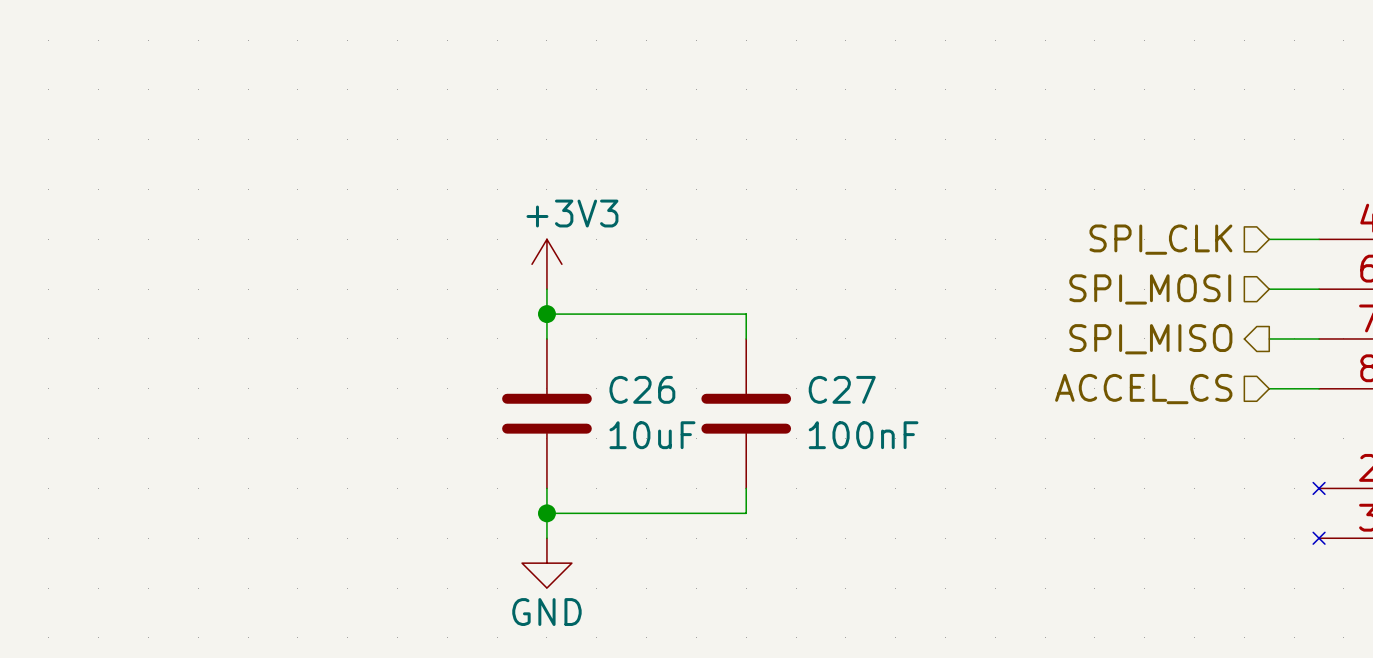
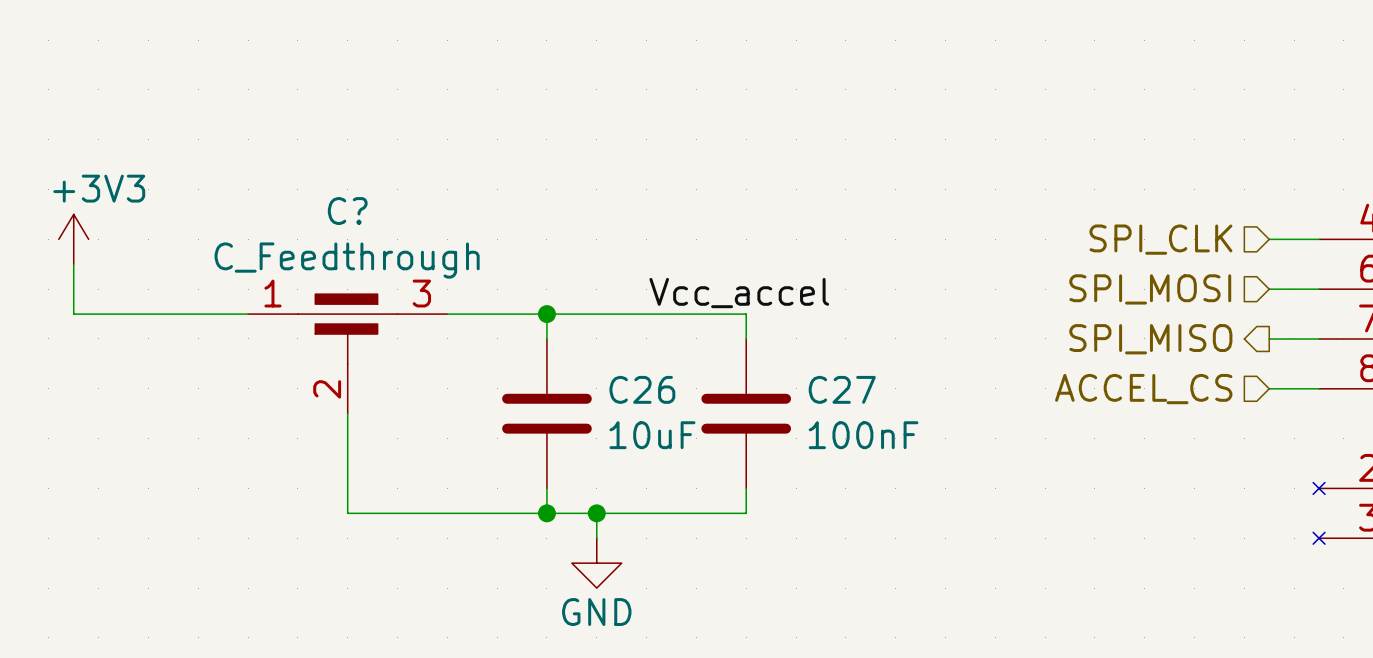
wire: none -> (73, 264) (73, 314) (248, 314)
power symbol position: +3V3 (546, 264) -> +3V3 (73, 239)
wire: (546, 289) (546, 314) -> (447, 314) (546, 314)
label: none -> Vcc_accel (739, 293)
C?: none -> C_Feedthrough (347, 353)
wire: (546, 513) (546, 538) -> (546, 513) (347, 513) (347, 413)
wire: none -> (596, 513) (596, 538)
junction: none -> (596, 513)
power symbol position: GND (546, 563) -> GND (596, 563)

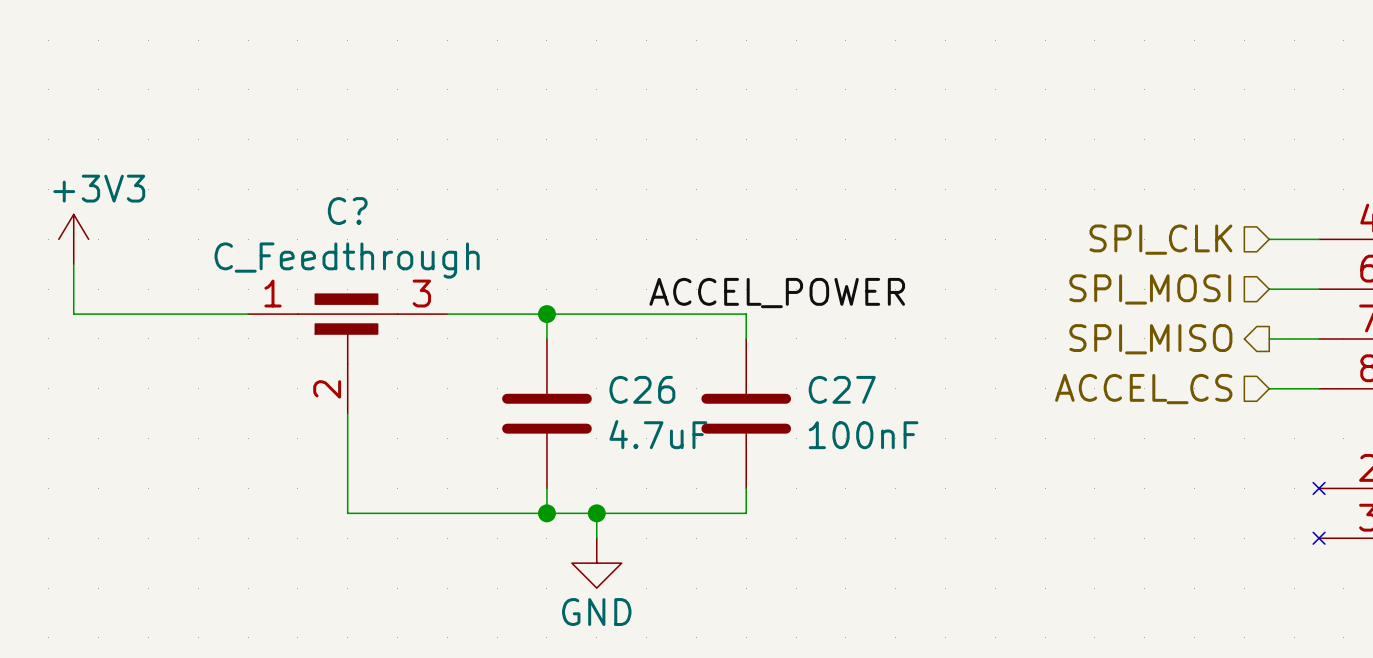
label: Vcc_accel (739, 293) -> ACCEL_POWER (777, 293)
C26 value: 10uF (652, 435) -> 4.7uF (658, 434)

